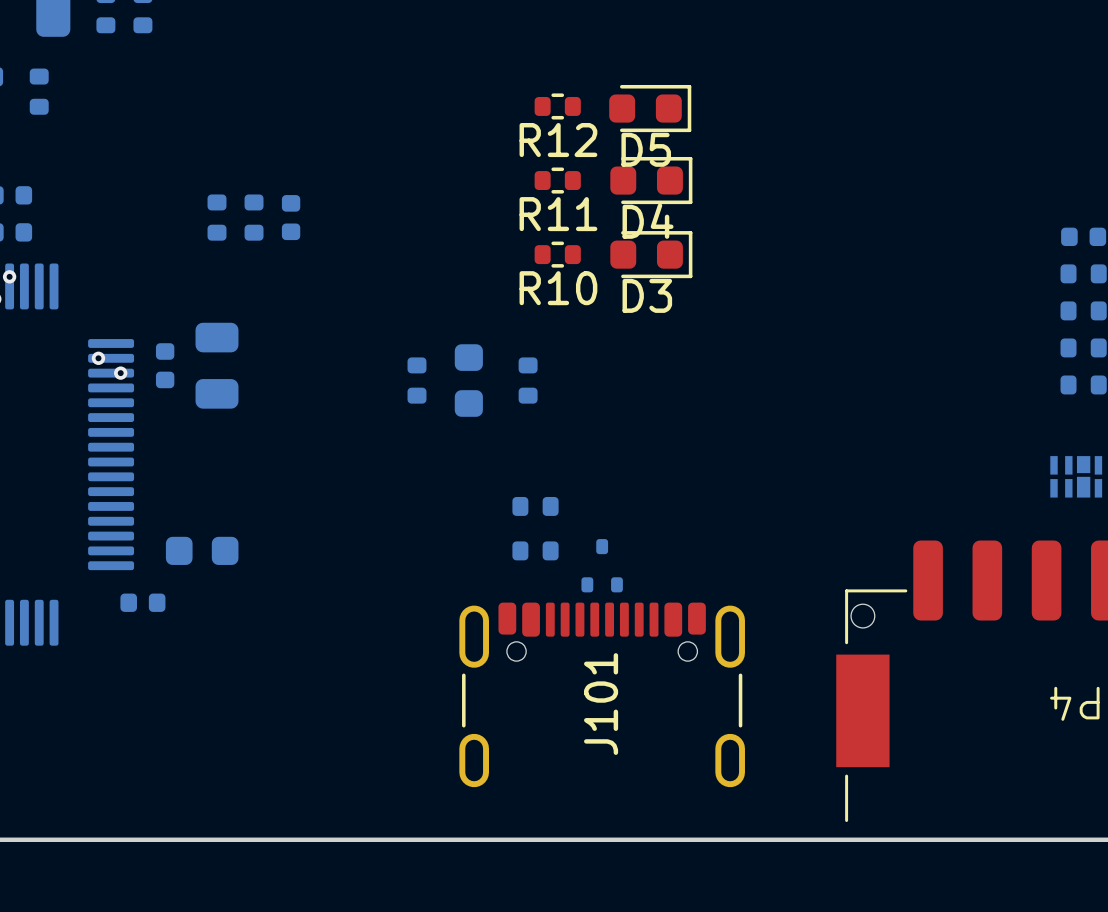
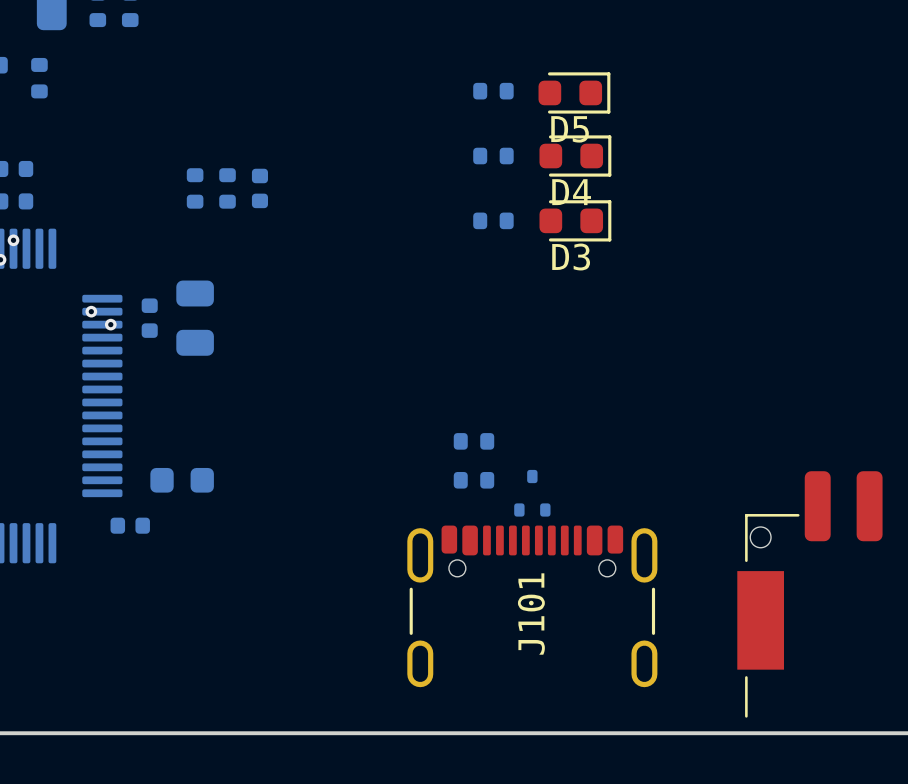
R12 side: top (557, 106) -> bottom (493, 91)
R11 side: top (557, 180) -> bottom (493, 156)
R10 side: top (557, 254) -> bottom (493, 220)
part: (416, 380) -> none
part: (468, 380) -> none
part: (528, 380) -> none

